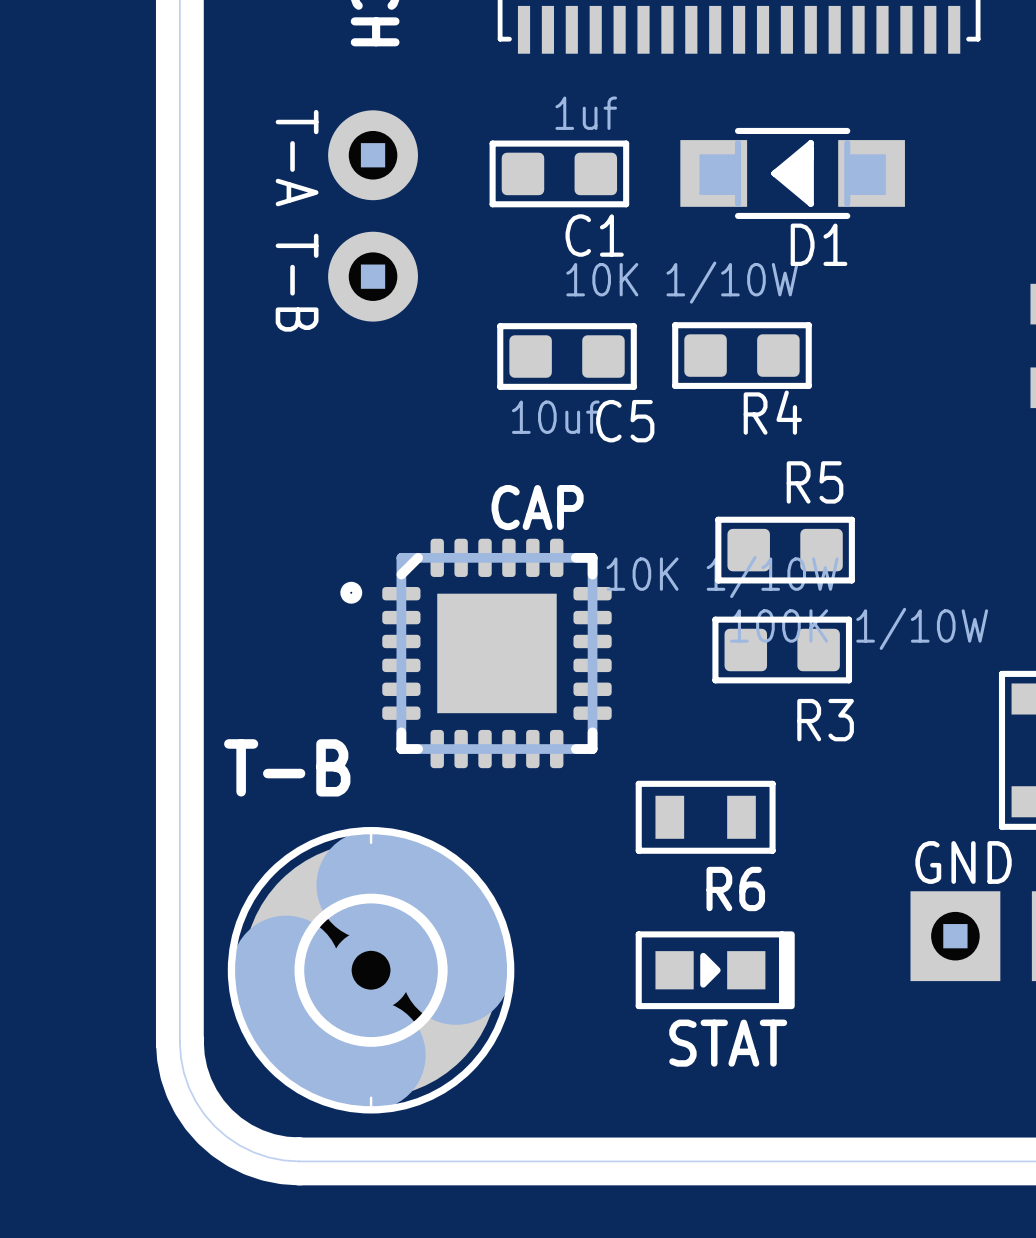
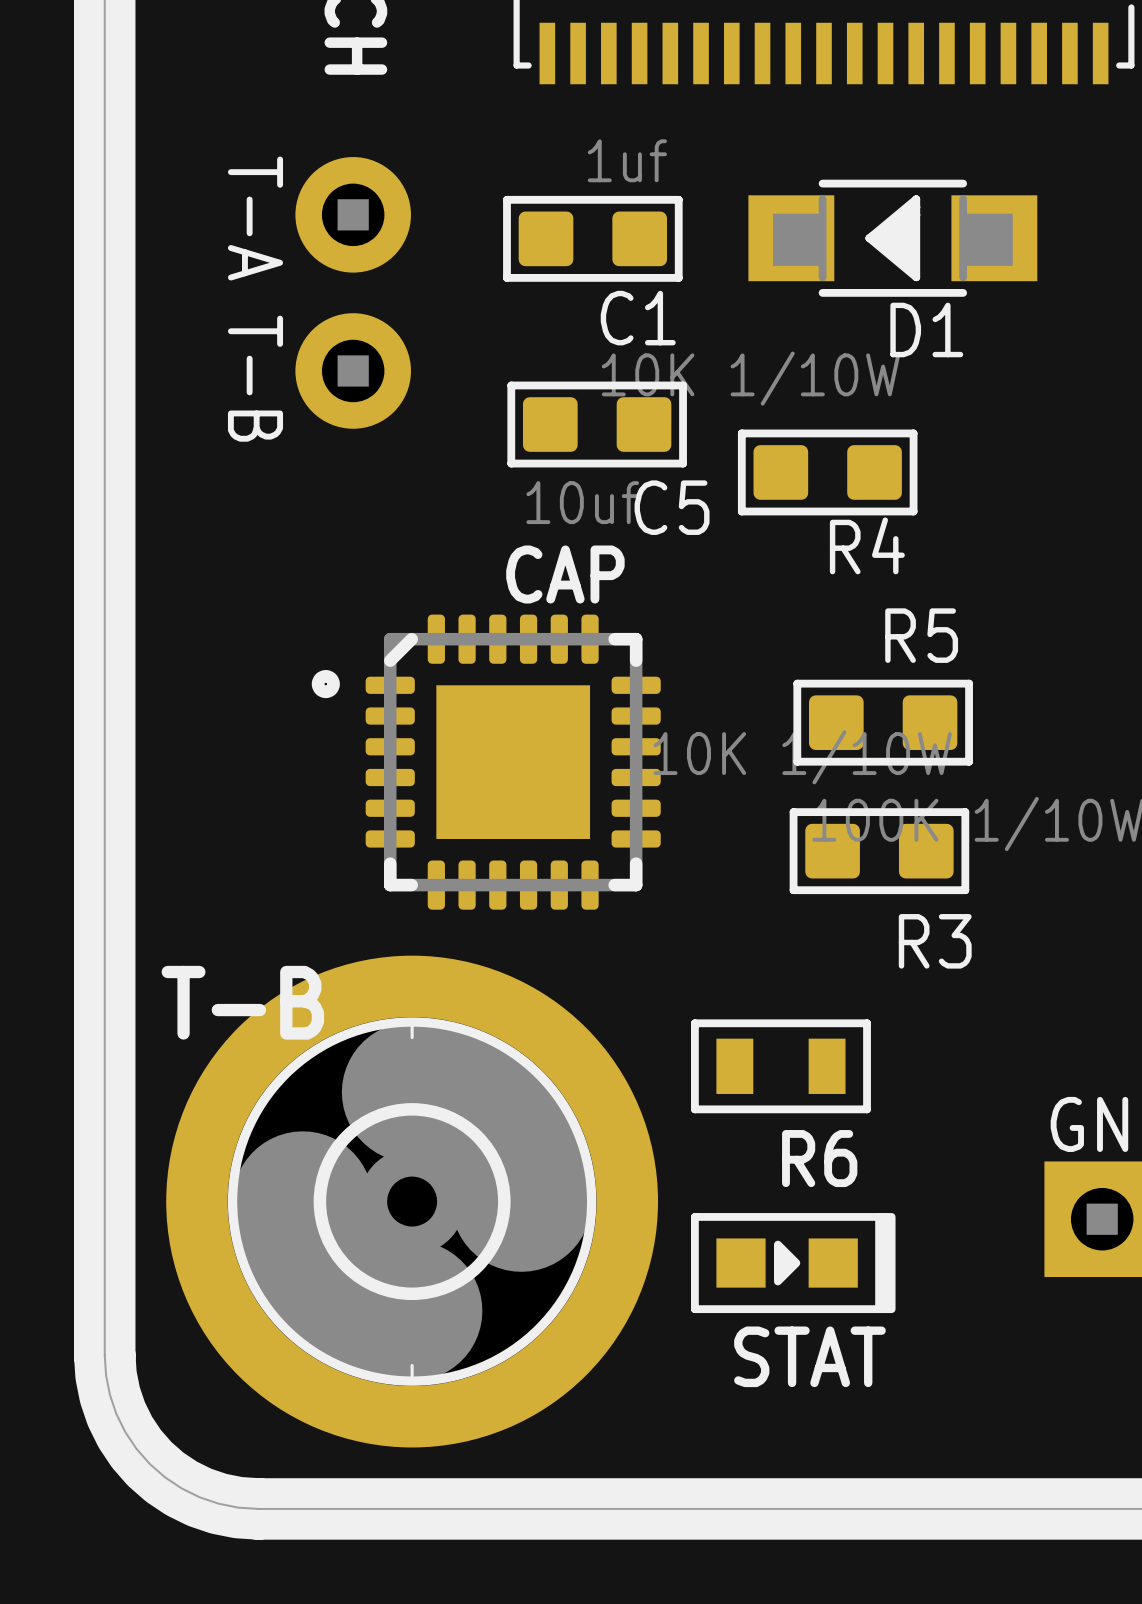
C5 position: (567, 356) -> (597, 424)
CAP position: (476, 653) -> (486, 762)
part: none -> (412, 1201)
part: (371, 970) -> none

